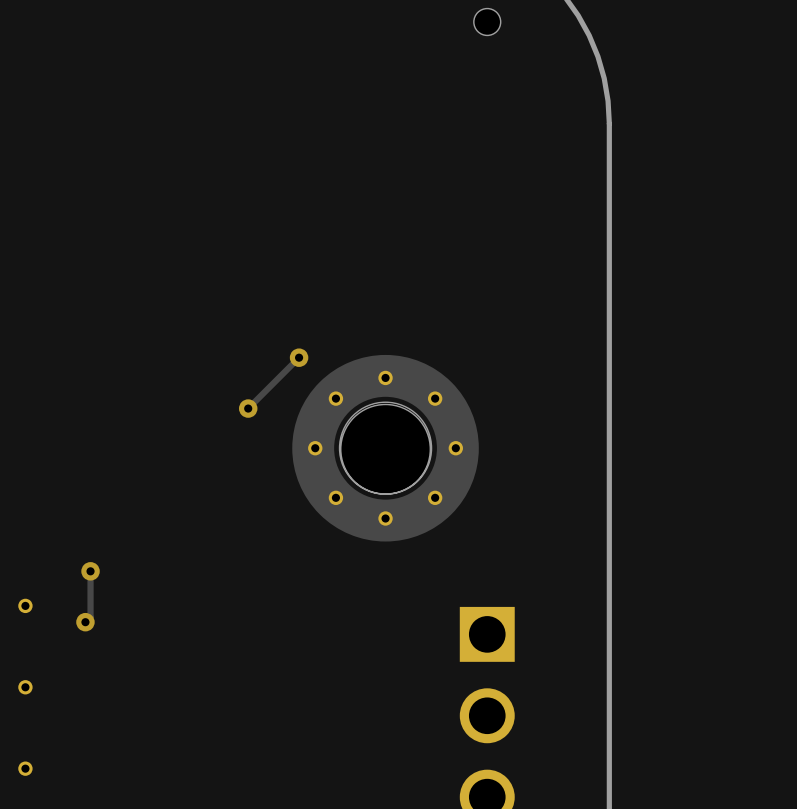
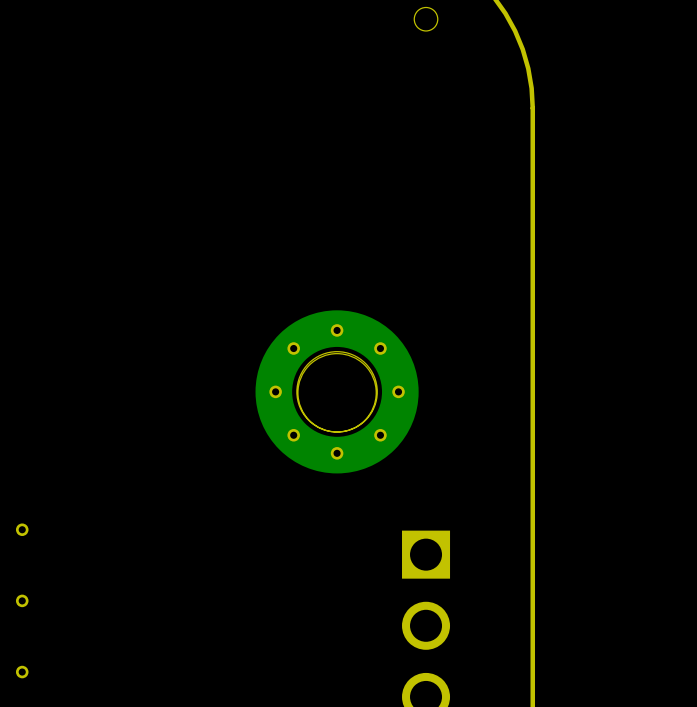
track: (299, 357) (248, 408) -> none
via: (299, 357) -> none
via: (248, 408) -> none
track: (90, 571) (90, 617) (85, 622) -> none
via: (90, 571) -> none
via: (85, 622) -> none

